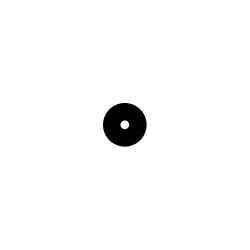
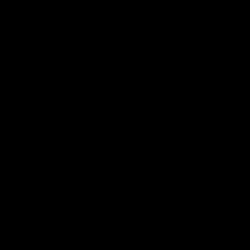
part: (124, 124) -> none

